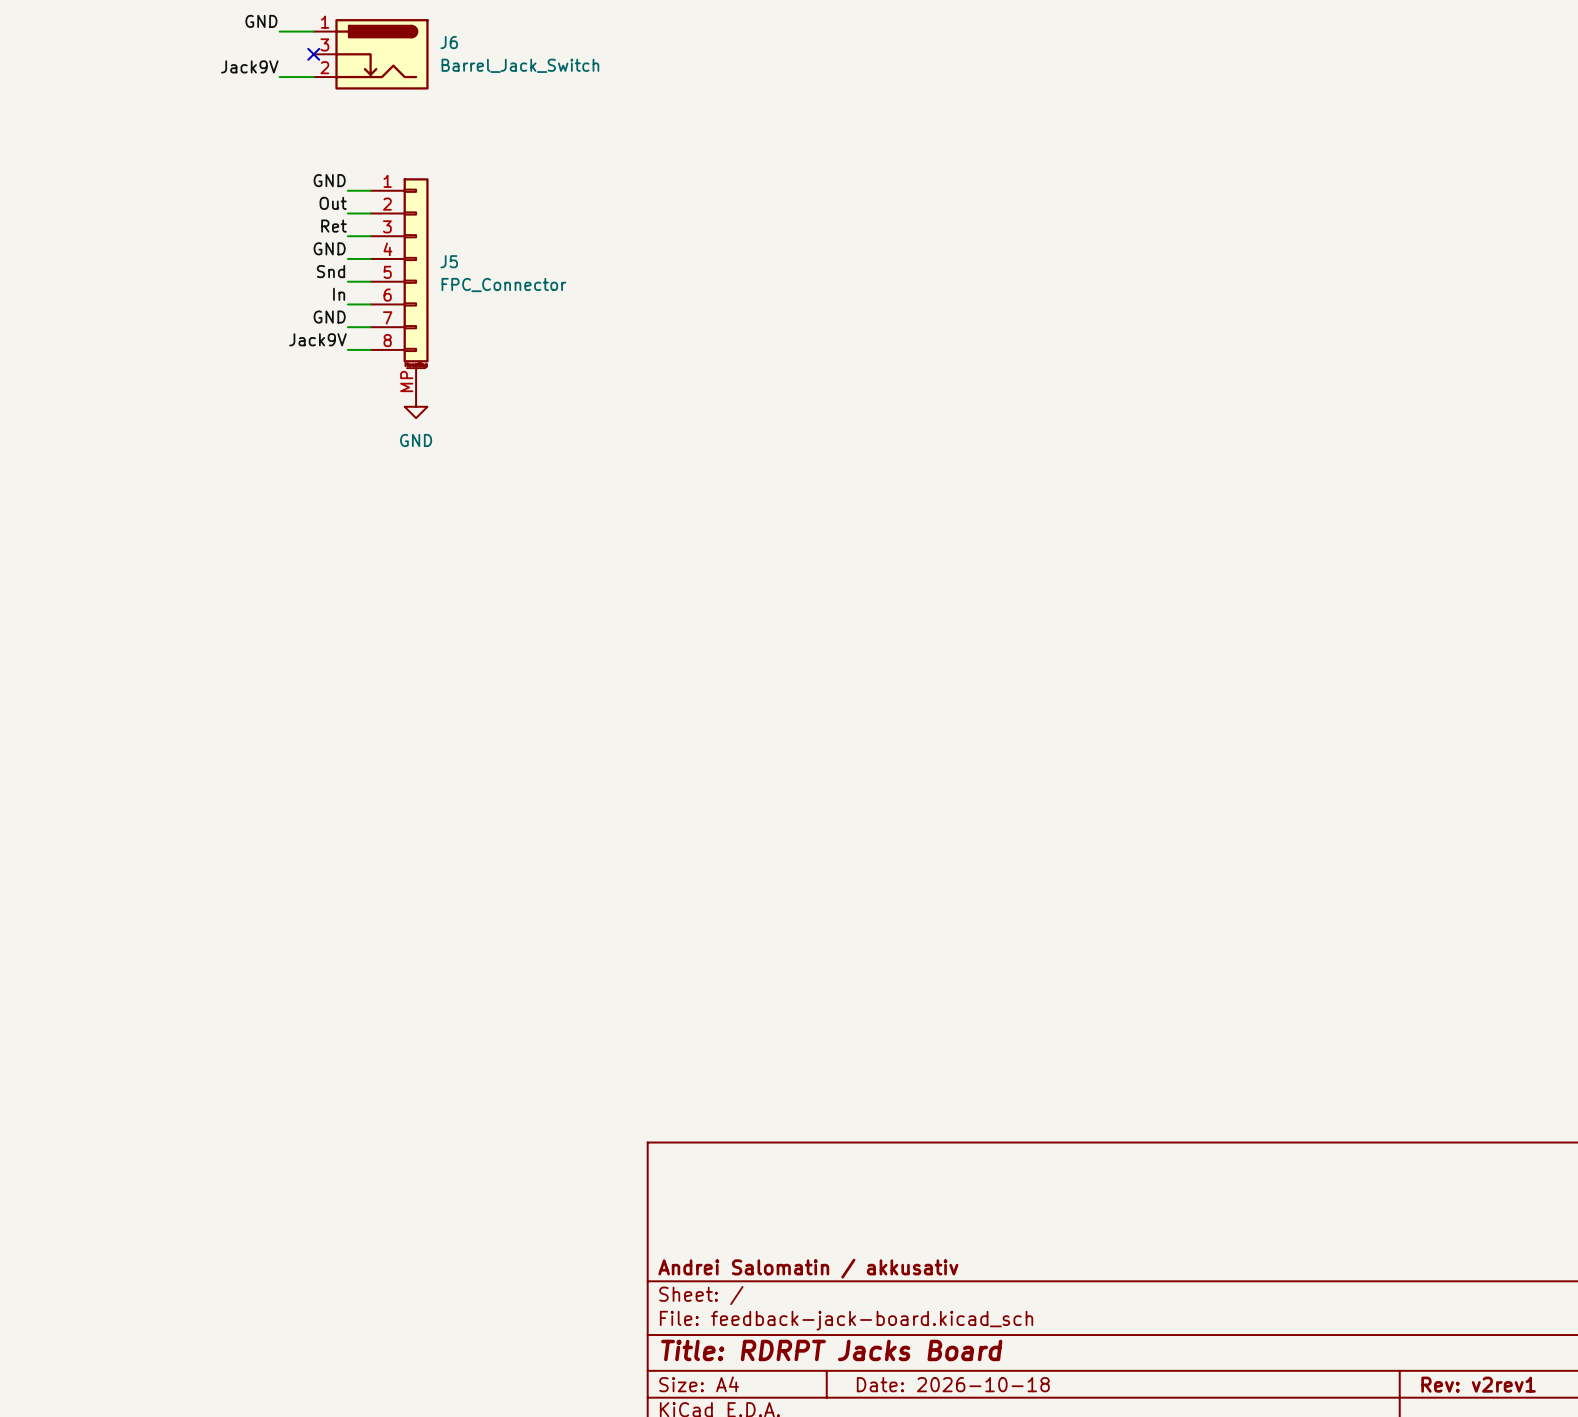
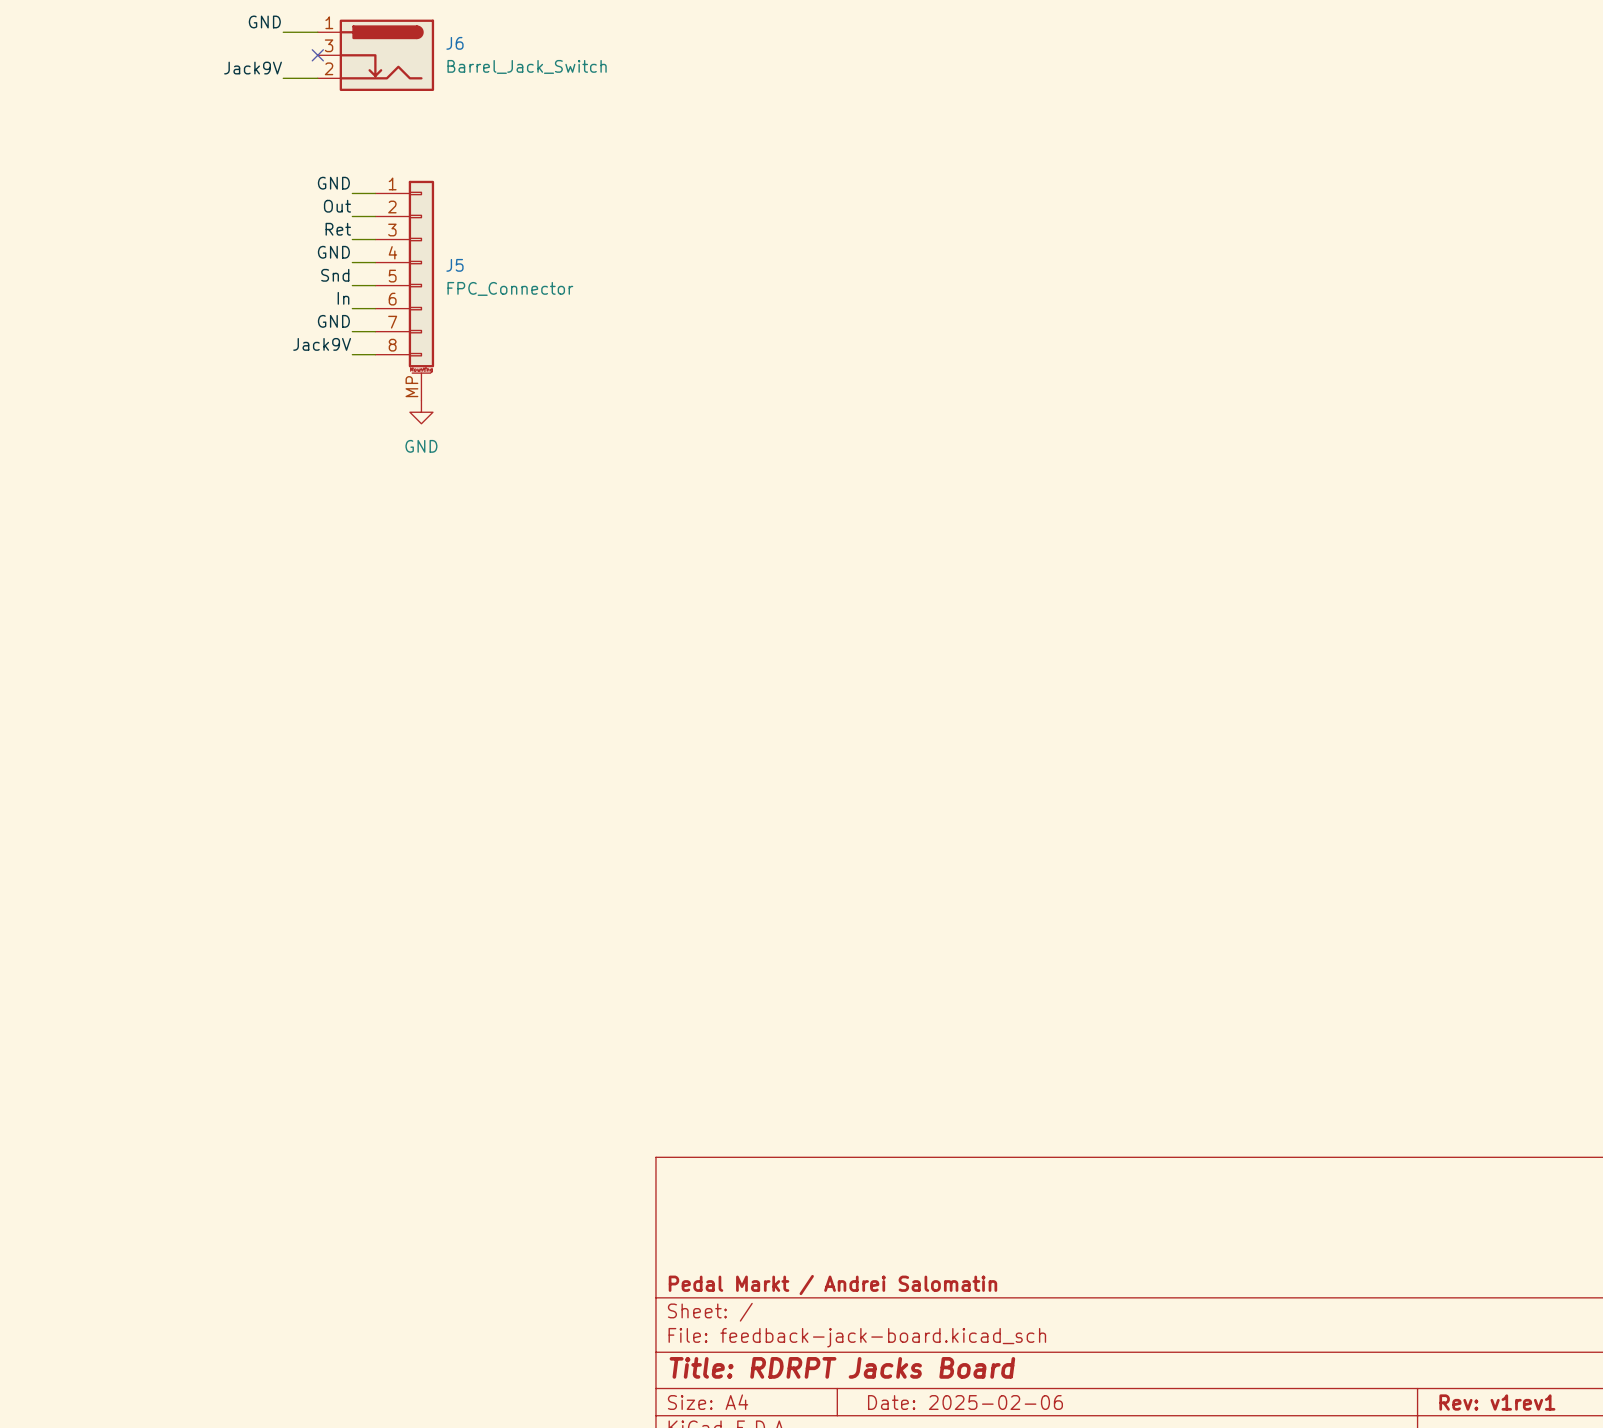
title block: Andrei Salomatin / akkusativ (808, 1268) -> Pedal Markt / Andrei Salomatin (832, 1285)
title block: Date: 2026-10-18 (953, 1384) -> Date: 2025-02-06 (965, 1402)
title block: Rev: v2rev1 (1478, 1384) -> Rev: v1rev1 (1497, 1402)

